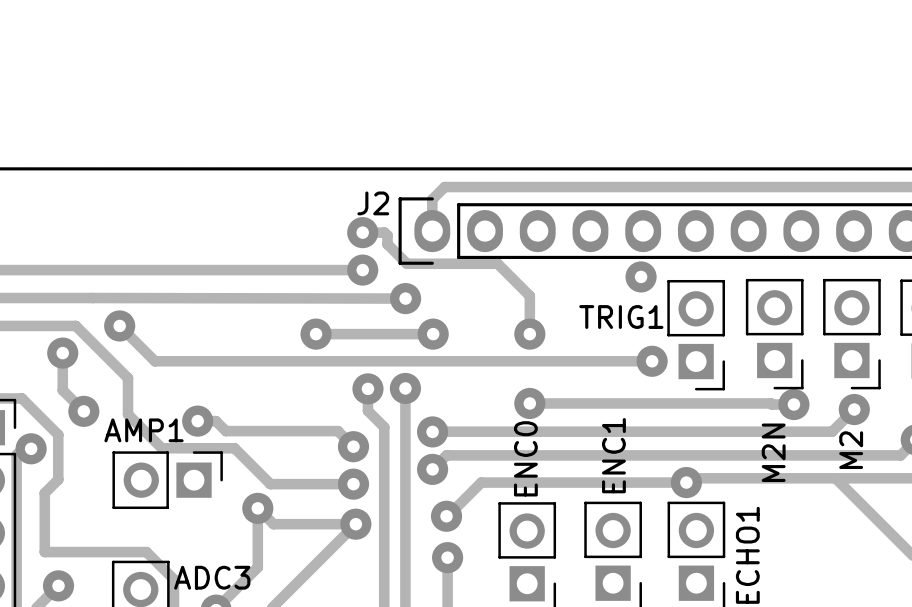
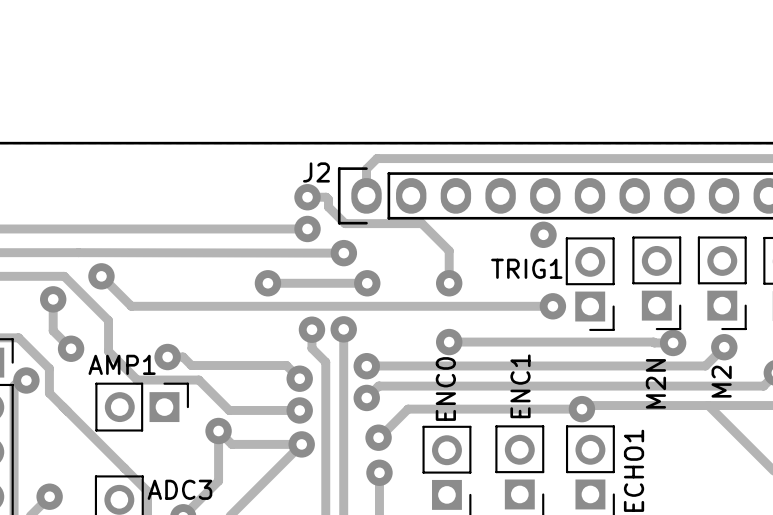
track: (58, 463) (58, 479) (44, 493) (44, 552) (146, 552) -> (49, 393) (124, 468)

